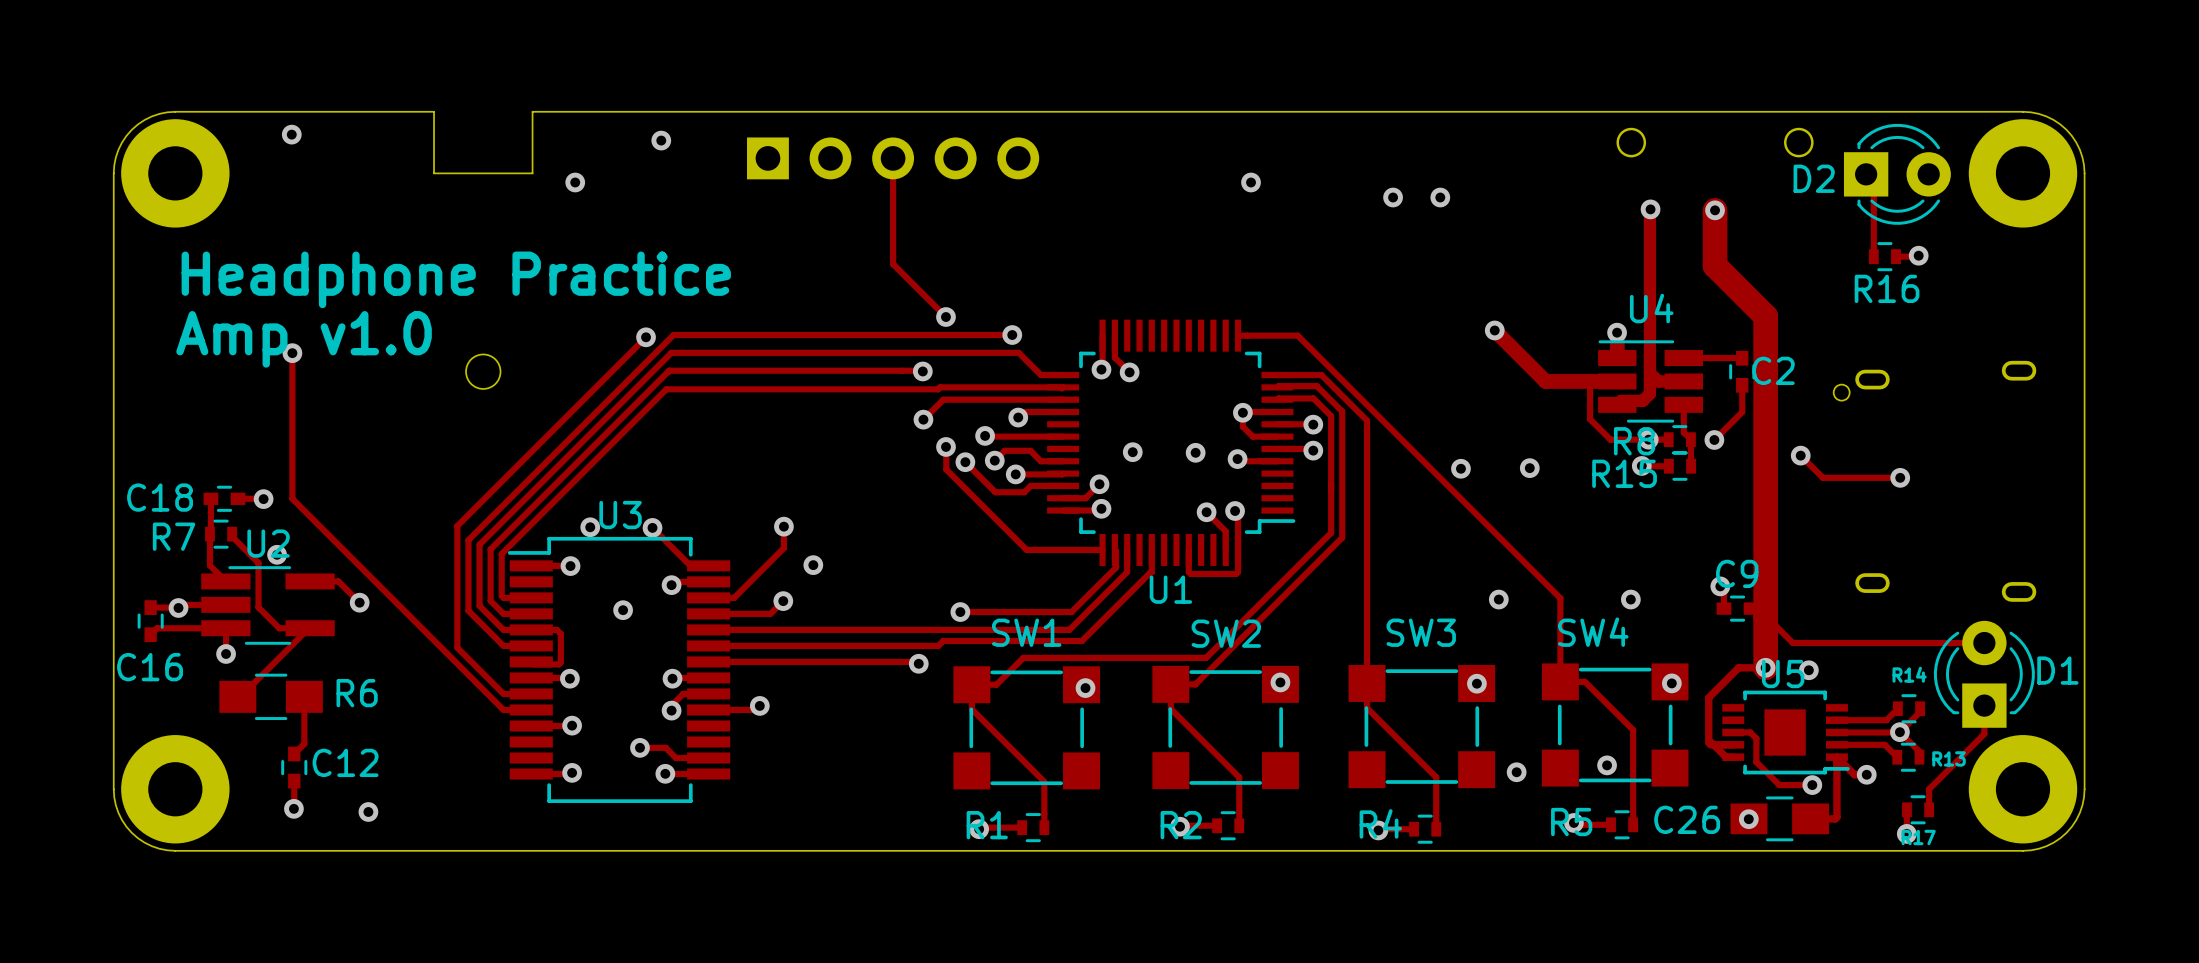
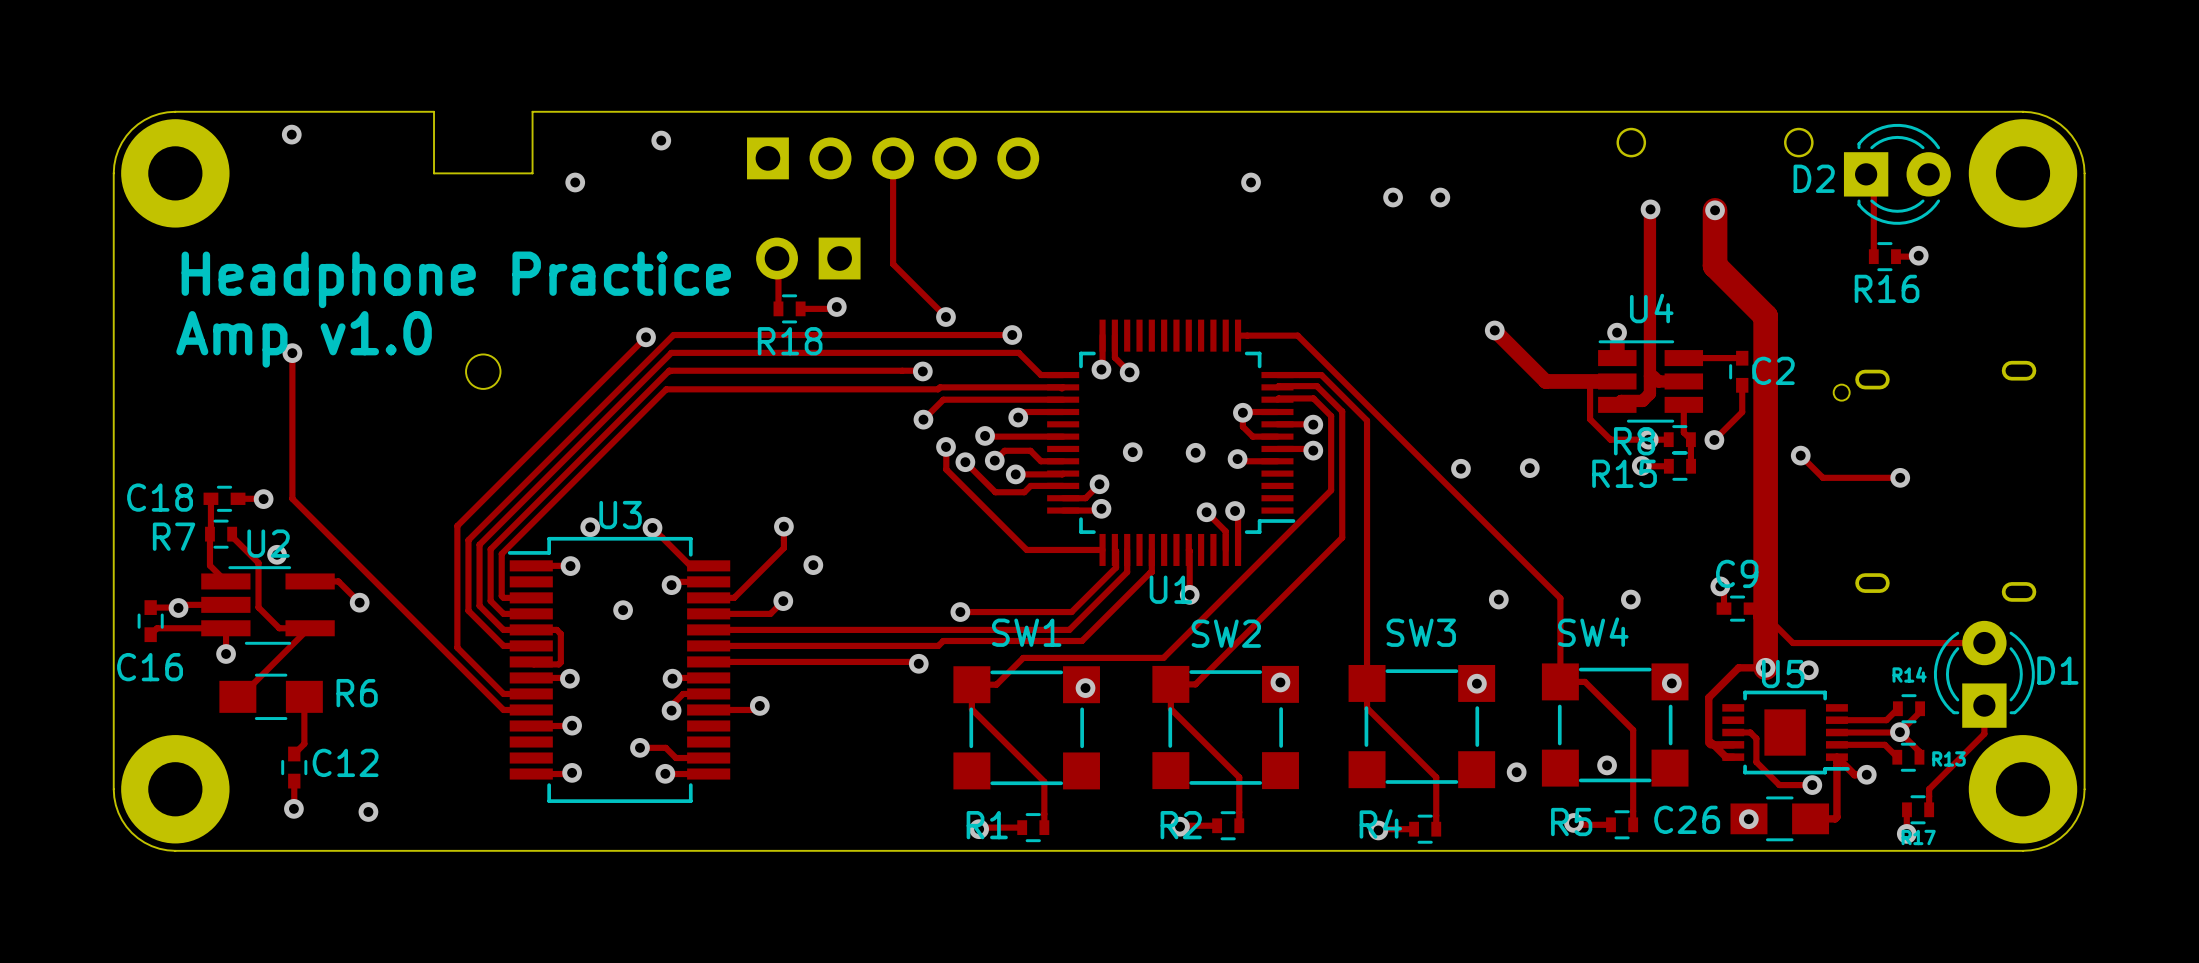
track: none -> (777, 258) (778, 308)
part: none -> (808, 258)
track: none -> (836, 307) (834, 308) (800, 308)
via: none -> (836, 307)
R18: none -> (789, 308)
track: (1331, 490) (1331, 532) (1206, 657) (1163, 657) -> (1331, 490) (1163, 657)
track: (1188, 549) (1188, 572) (1190, 573) (1236, 573) (1238, 572) (1238, 549) -> (1188, 549) (1189, 594)
via: none -> (1189, 594)

